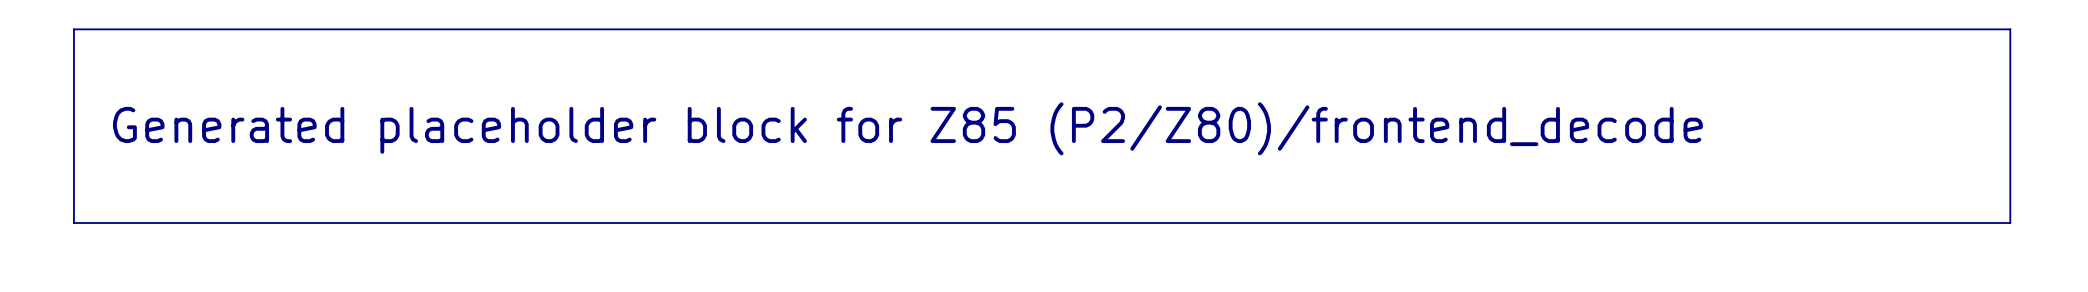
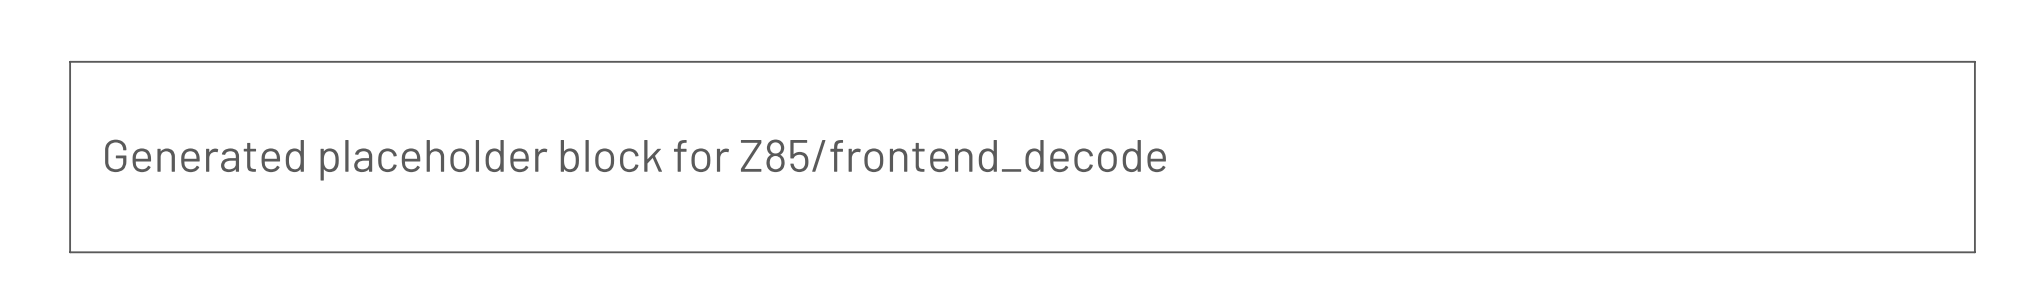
text: Generated placeholder block for Z85 (P2/Z80)/frontend_decode (907, 128) -> Generated placeholder block for Z85/frontend_decode (635, 160)

